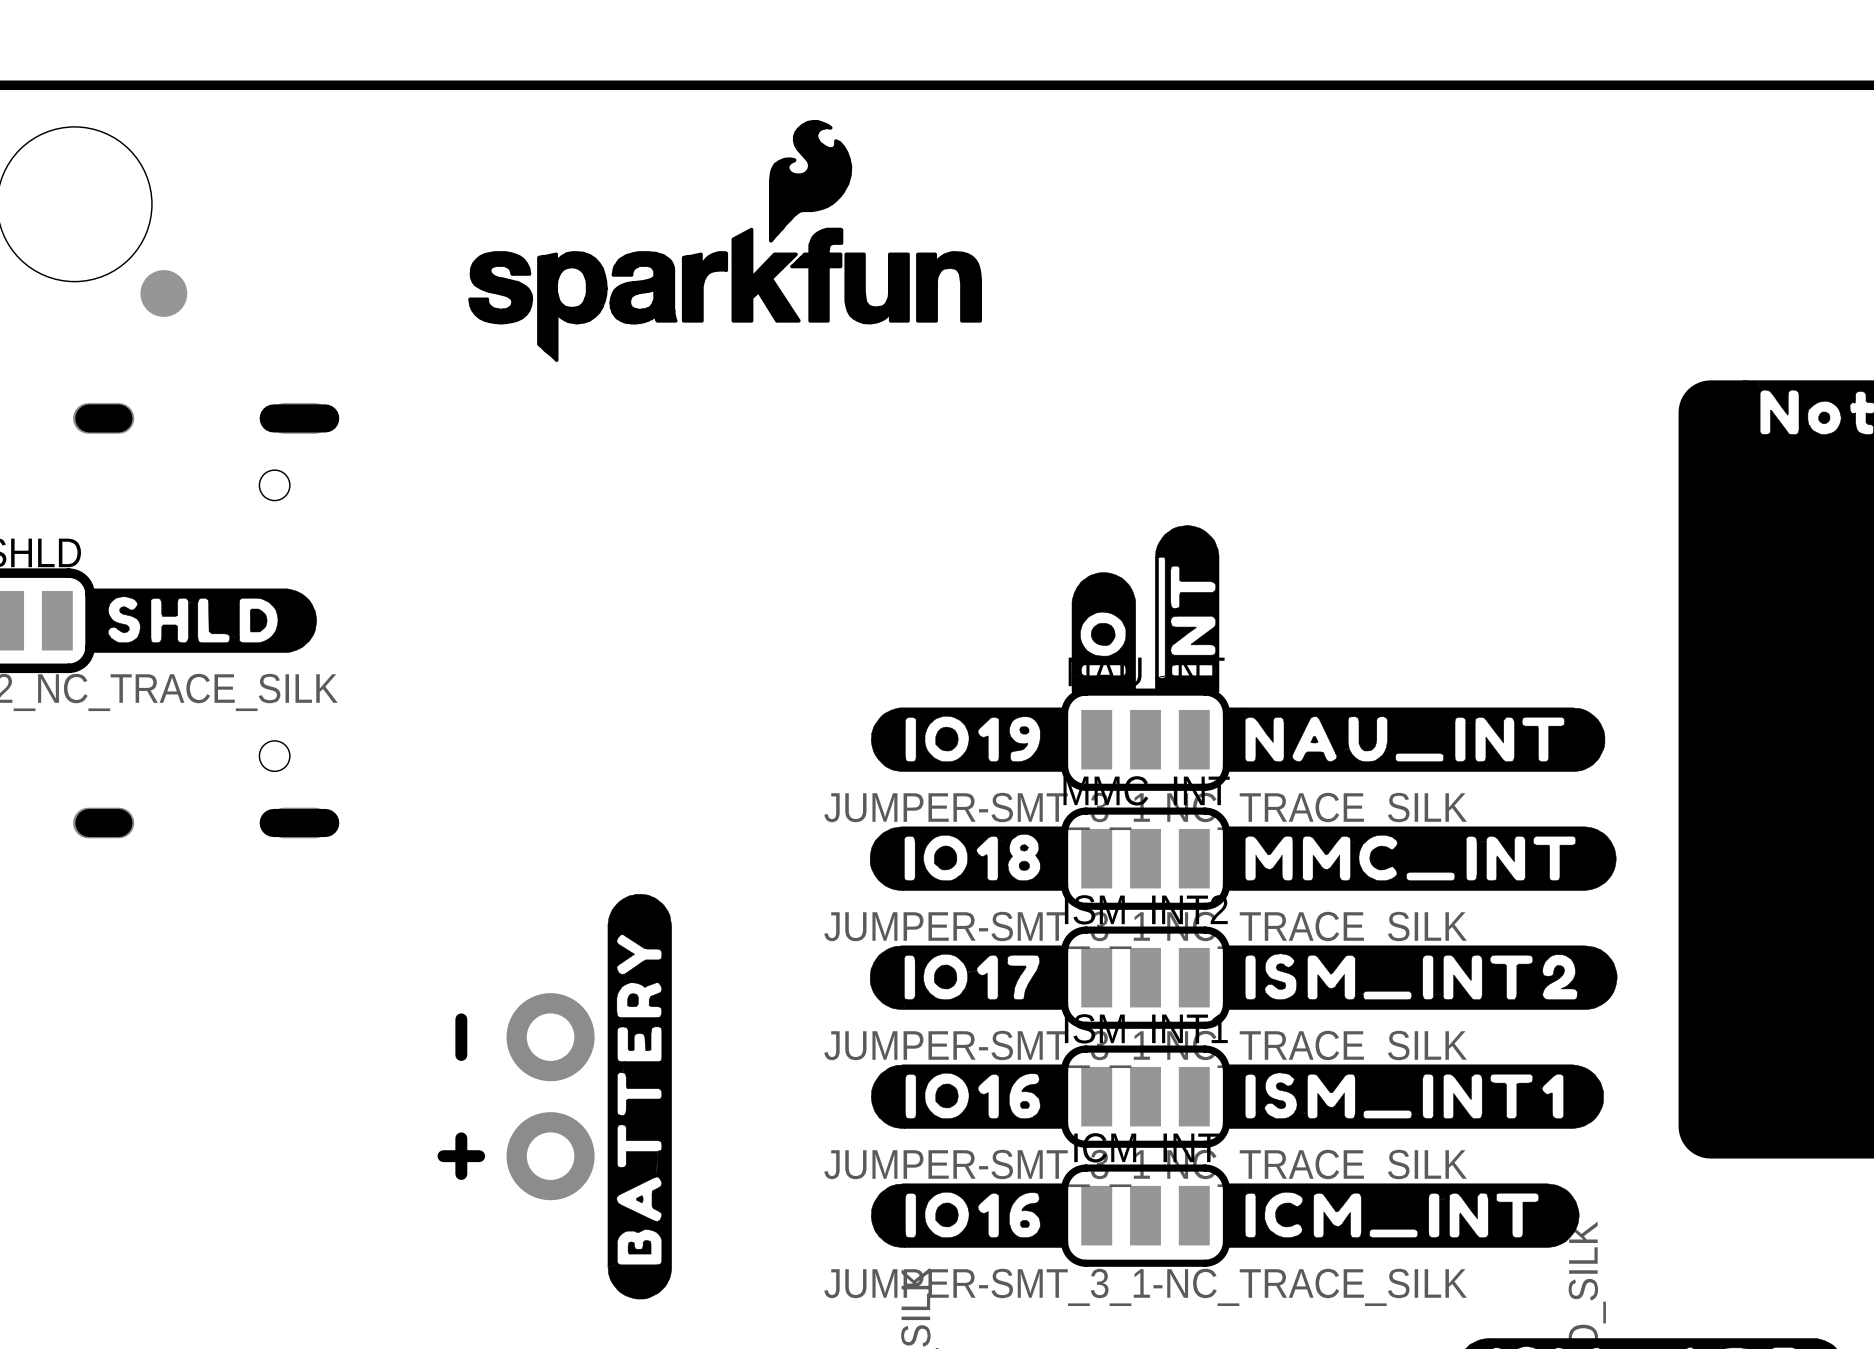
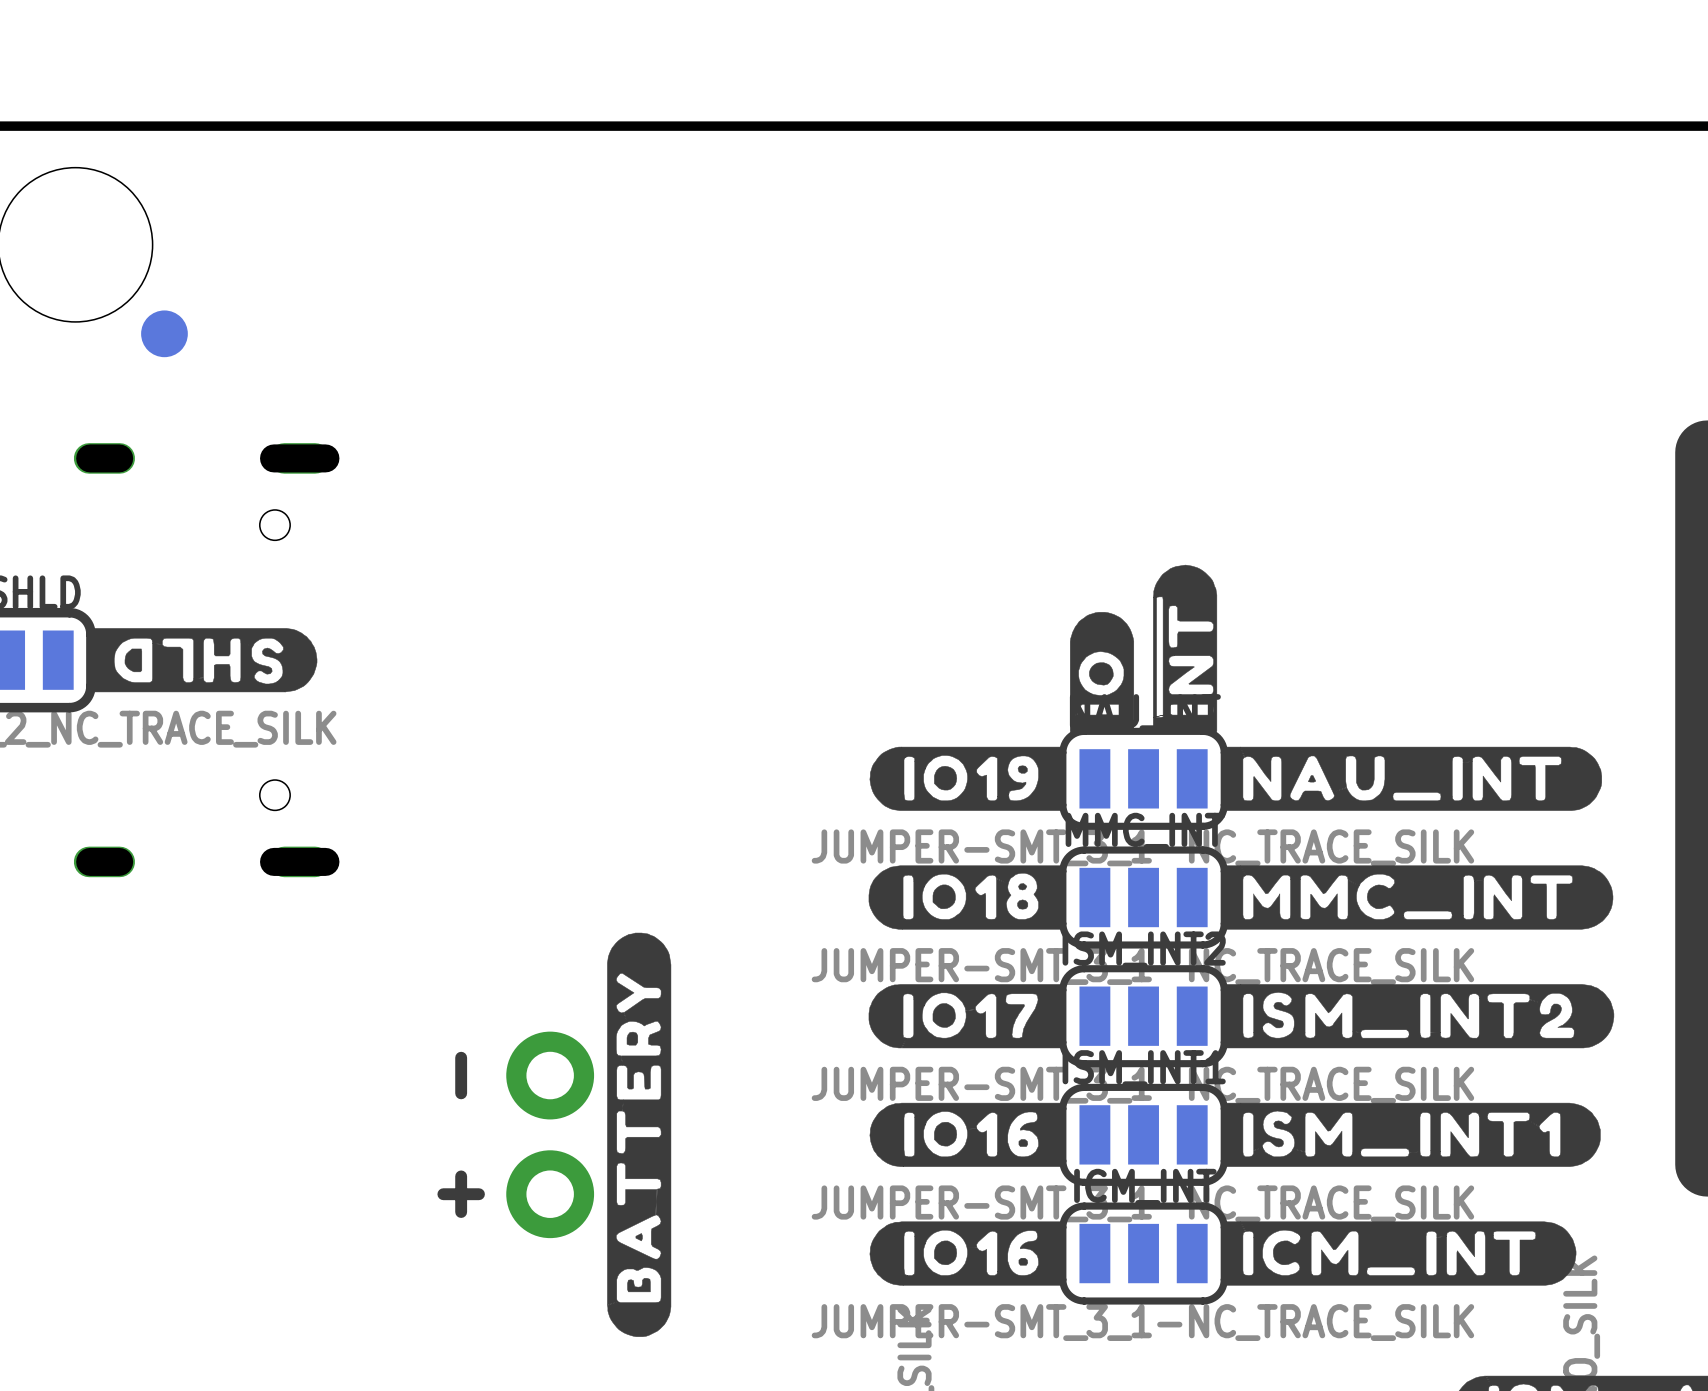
drawing: [468, 119, 982, 362] -> none
drawing shape: [90, 588, 318, 653] -> [91, 628, 318, 693]

